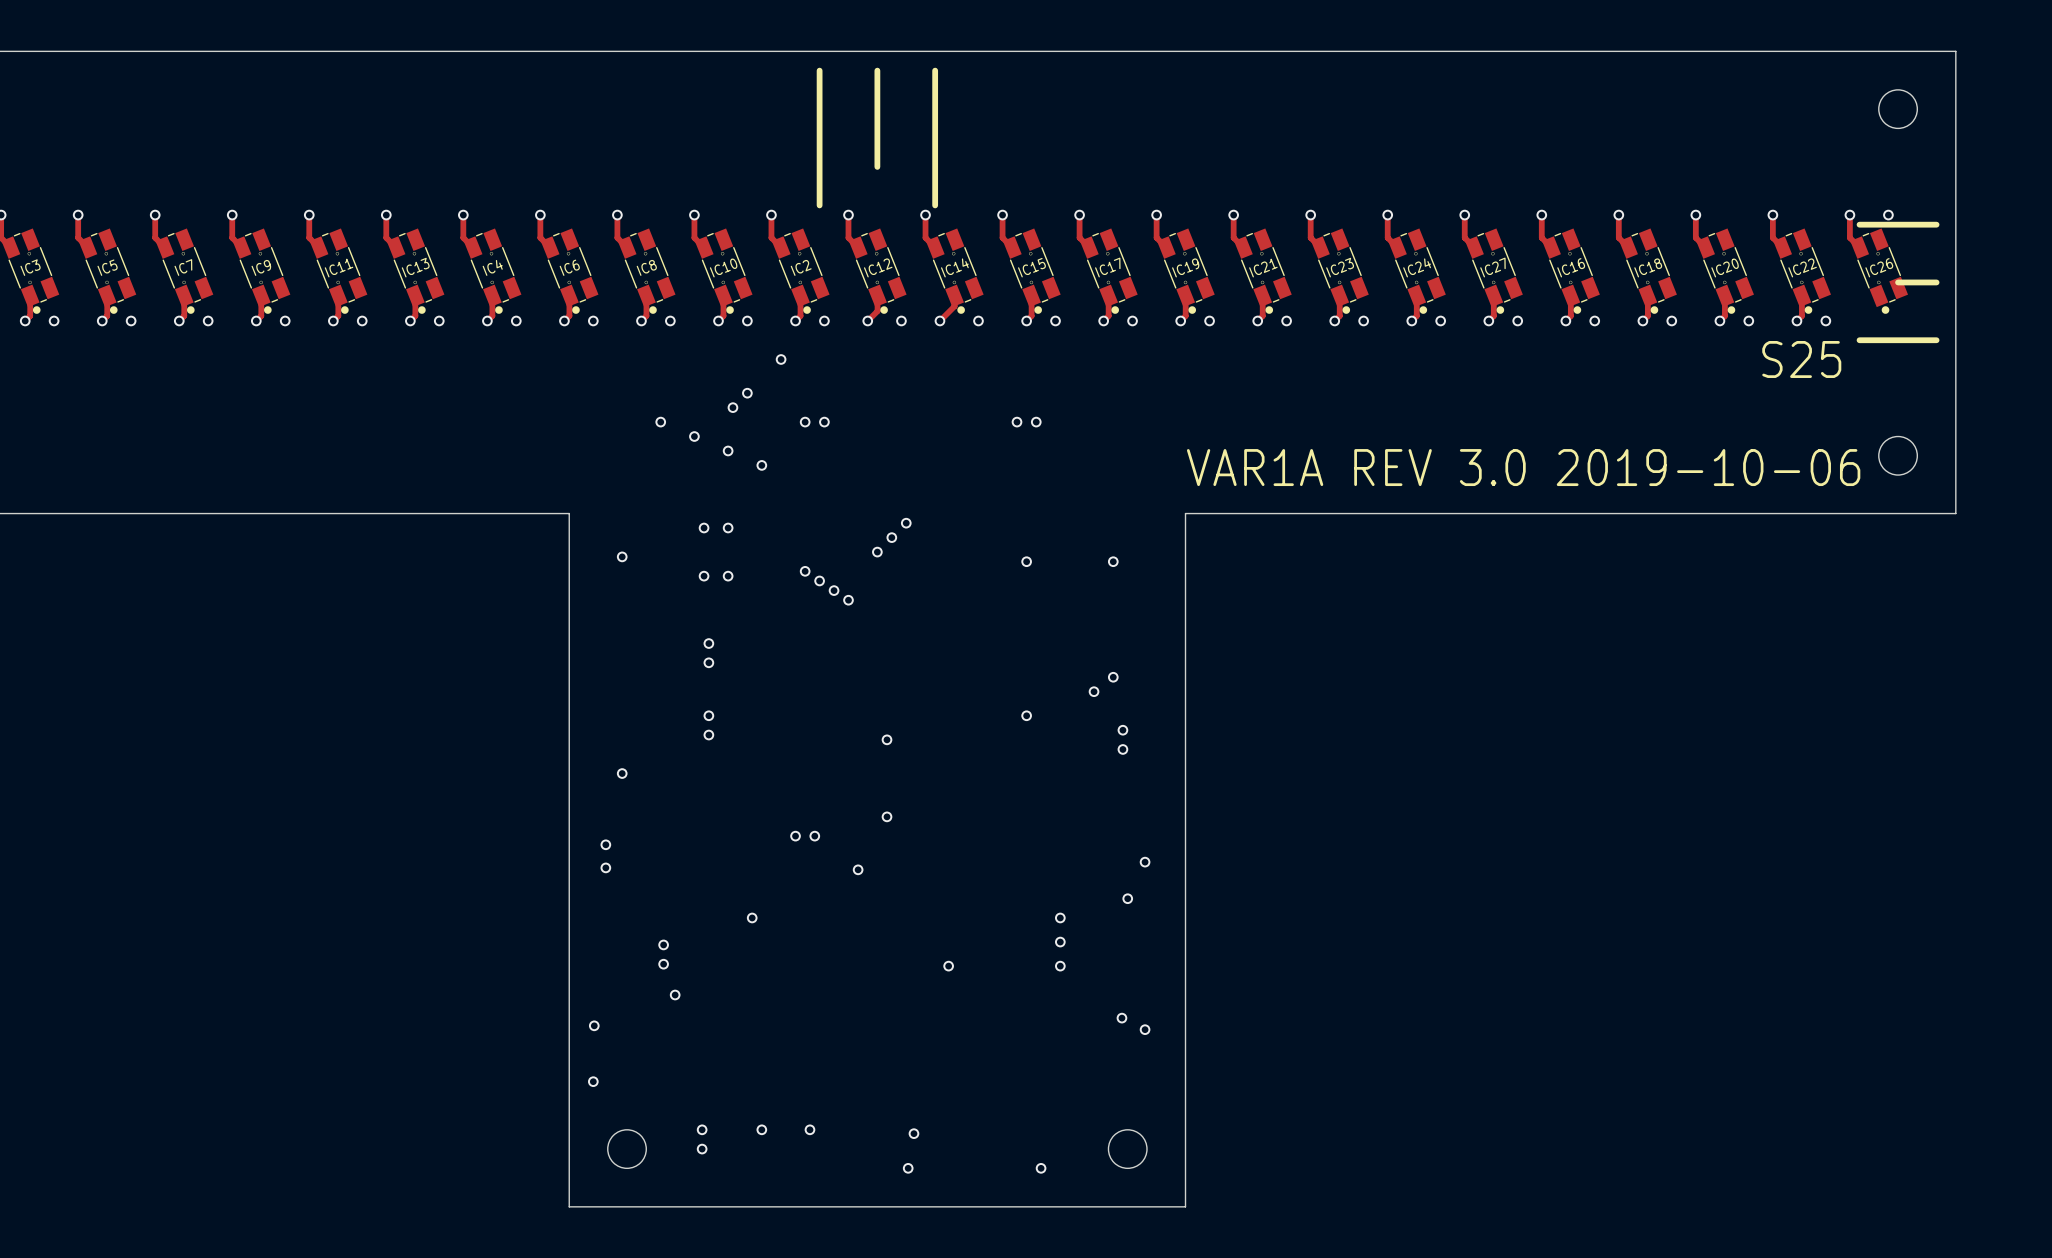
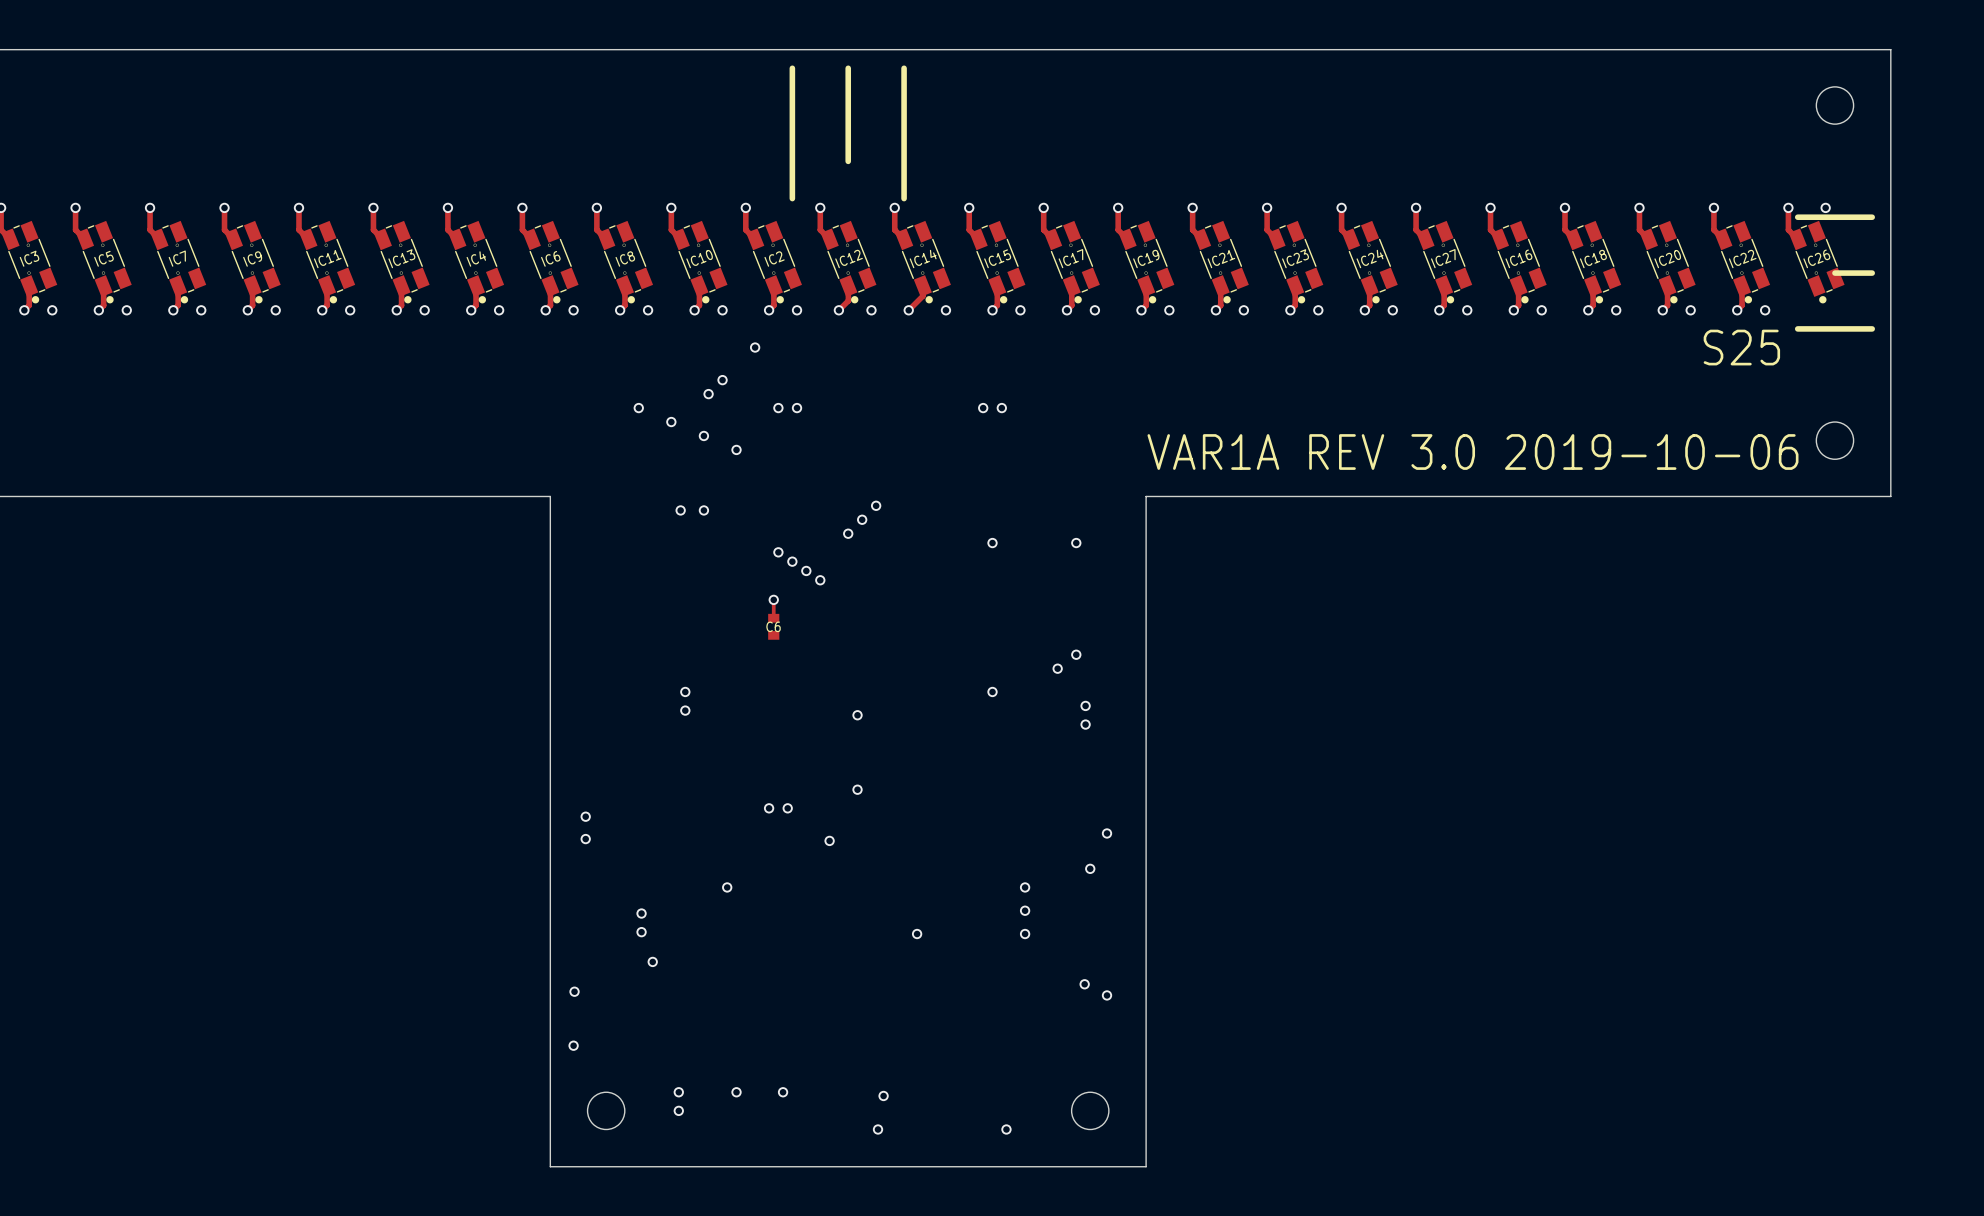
via: (622, 556) -> none
via: (704, 576) -> none
via: (728, 576) -> none
track: none -> (773, 598) (773, 618)
via: none -> (773, 599)
via: (708, 643) -> none
C6: none -> (773, 626)
via: (708, 662) -> none
via: (622, 773) -> none

